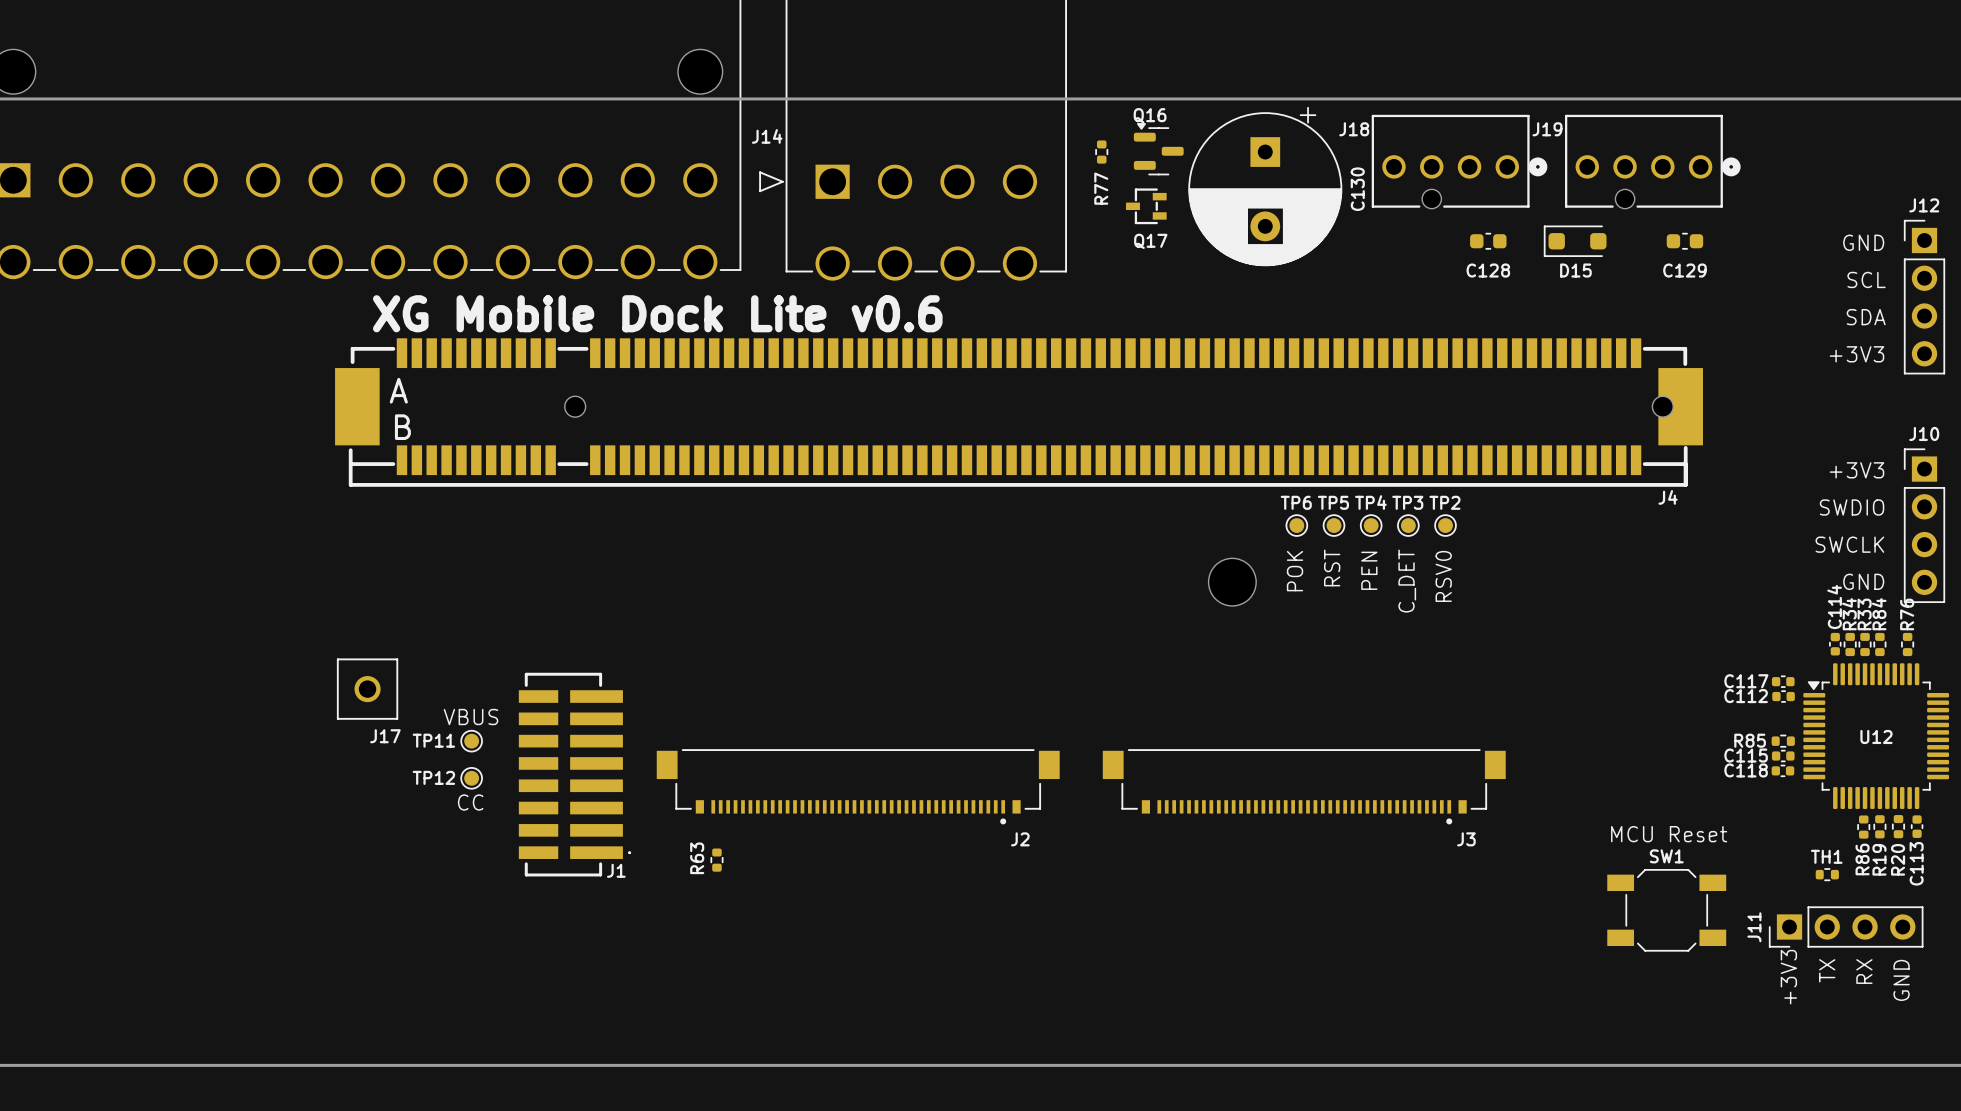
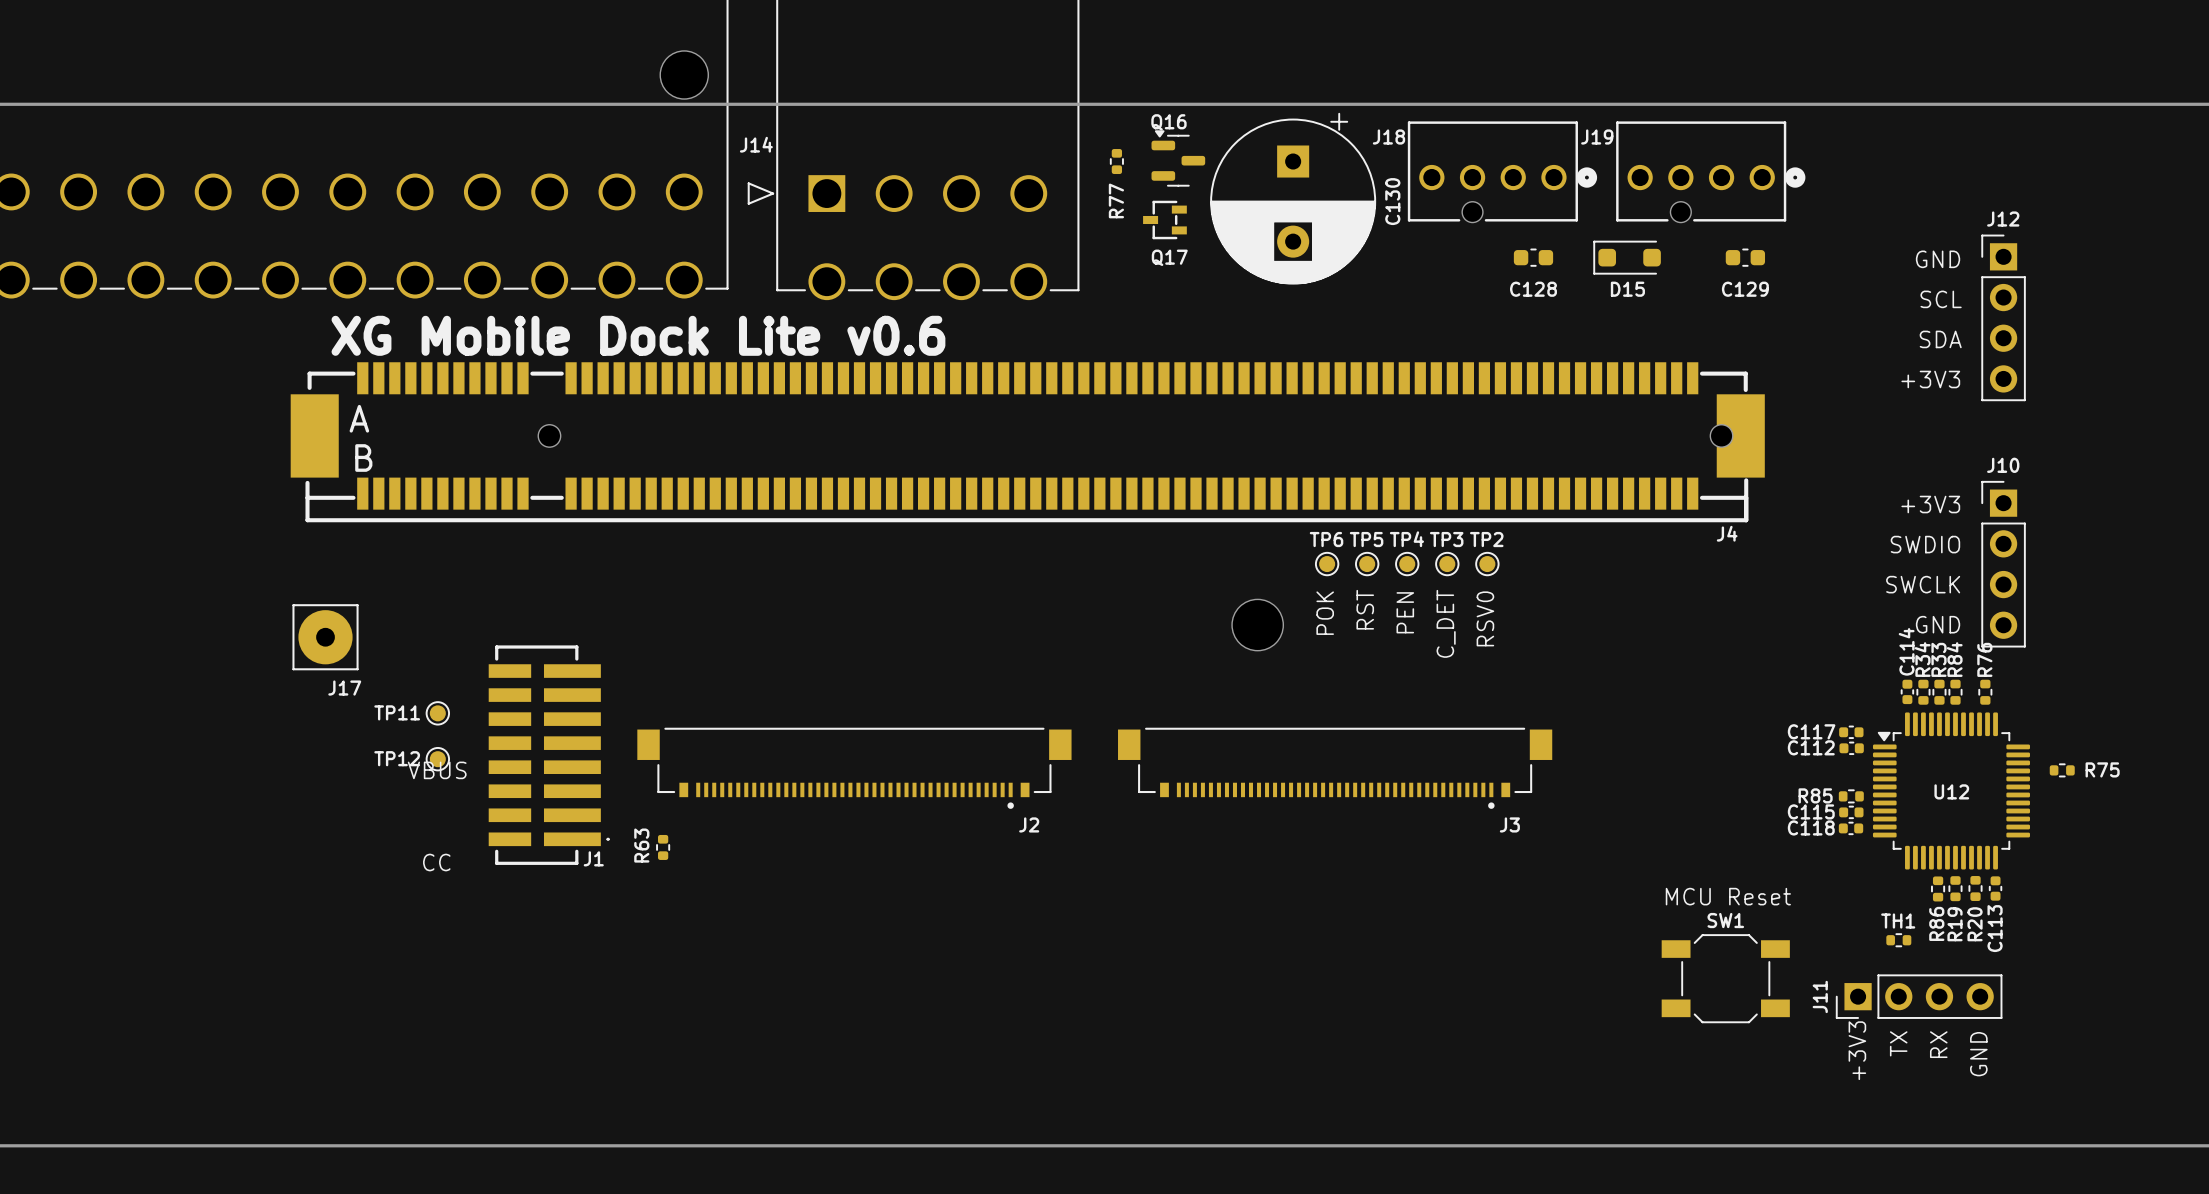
J17 footprint: [336, 658, 399, 720] -> [292, 604, 359, 671]
TP11 position: (471, 741) -> (437, 713)
J1 position: (574, 774) -> (549, 755)
TP12 position: (471, 778) -> (437, 759)
J2 position: (858, 786) -> (854, 768)
J3 position: (1304, 786) -> (1335, 768)
R63 position: (716, 860) -> (663, 847)

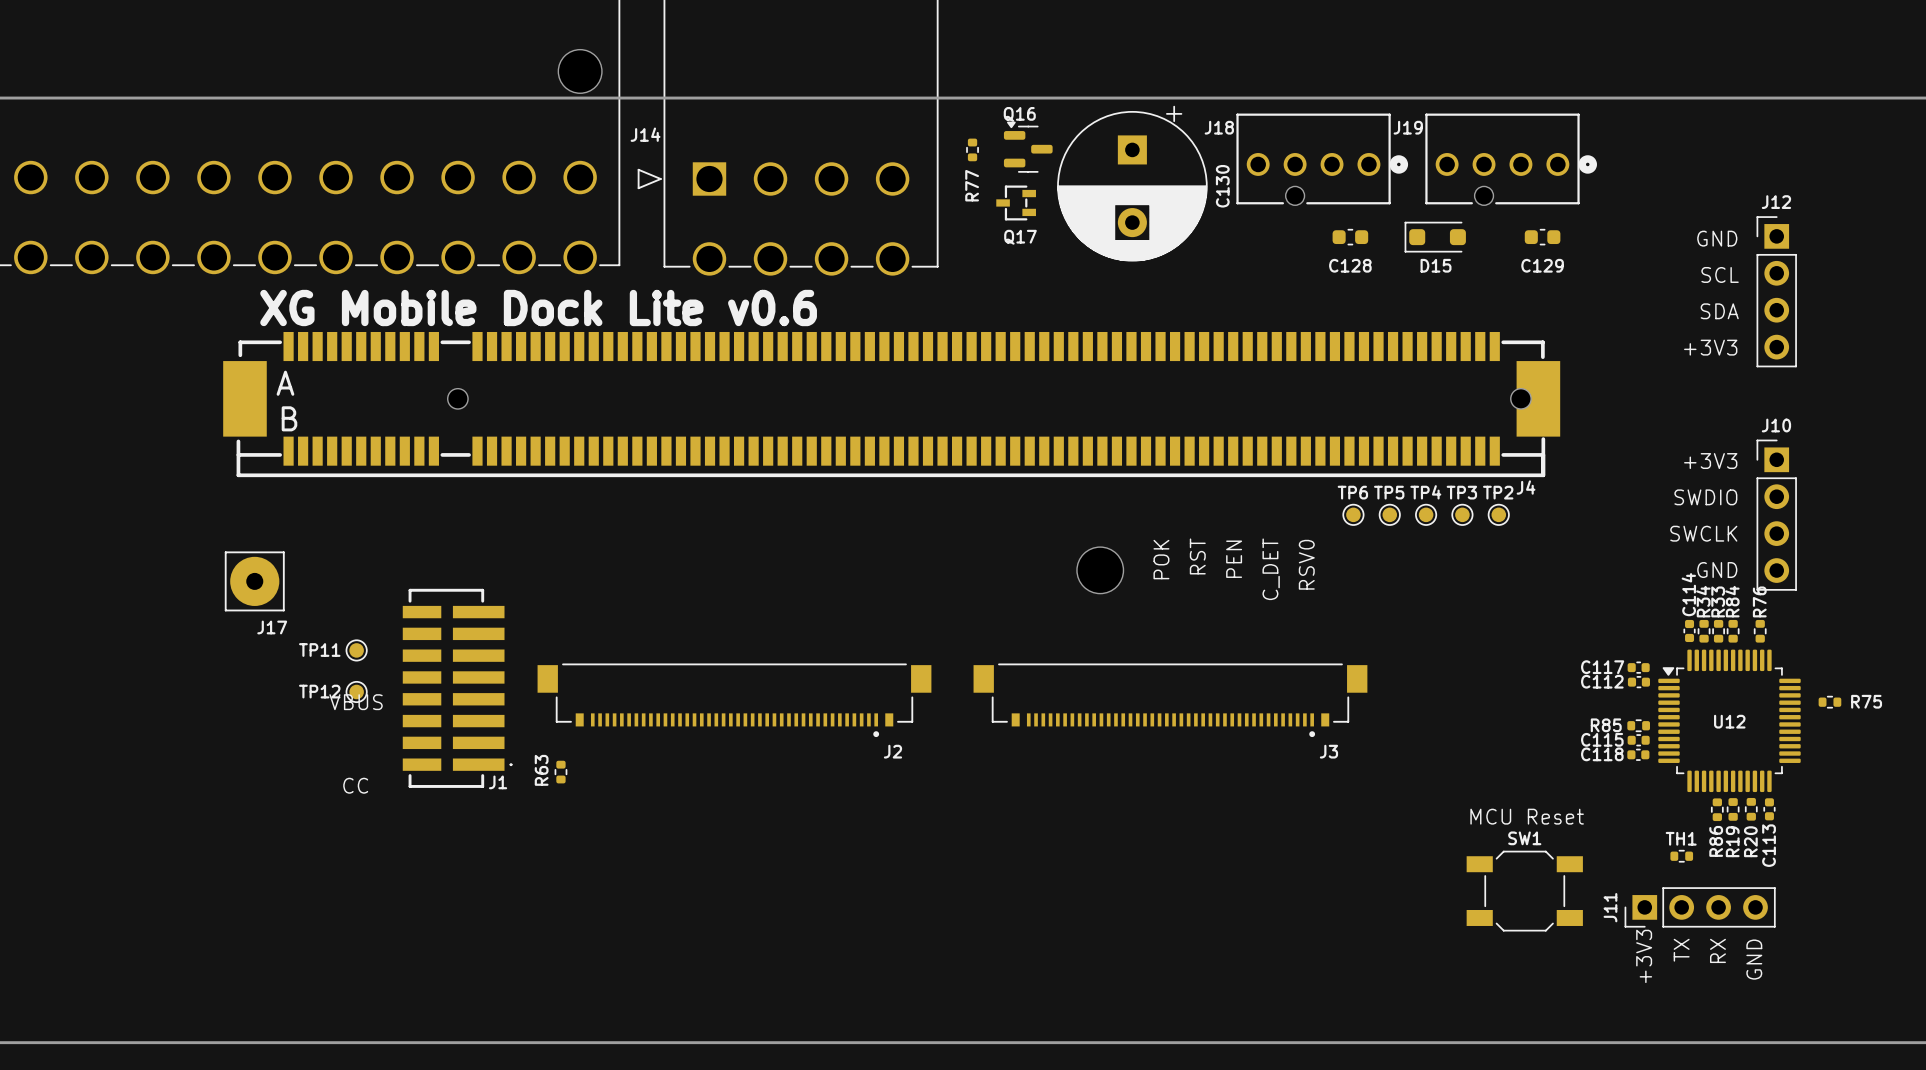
TP6 position: (1327, 564) -> (1353, 514)
TP5 position: (1367, 564) -> (1389, 514)
TP4 position: (1407, 564) -> (1426, 514)
TP3 position: (1447, 564) -> (1462, 514)
TP2 position: (1487, 564) -> (1498, 514)

